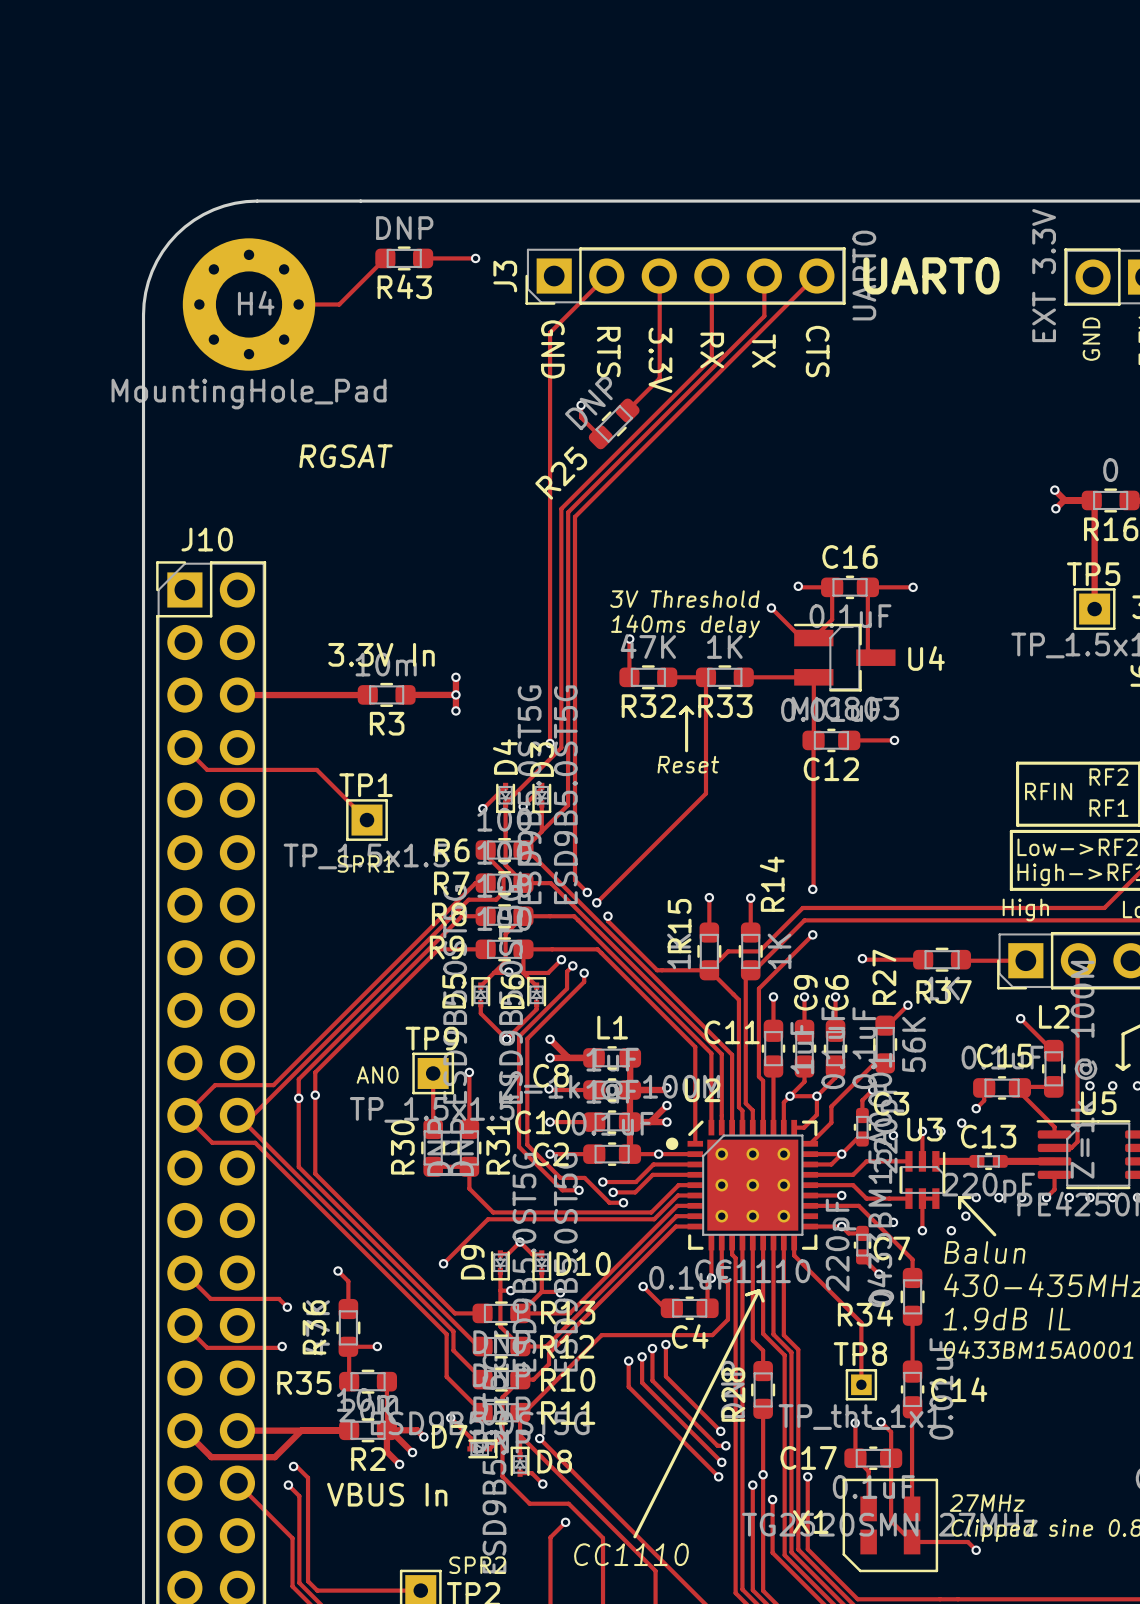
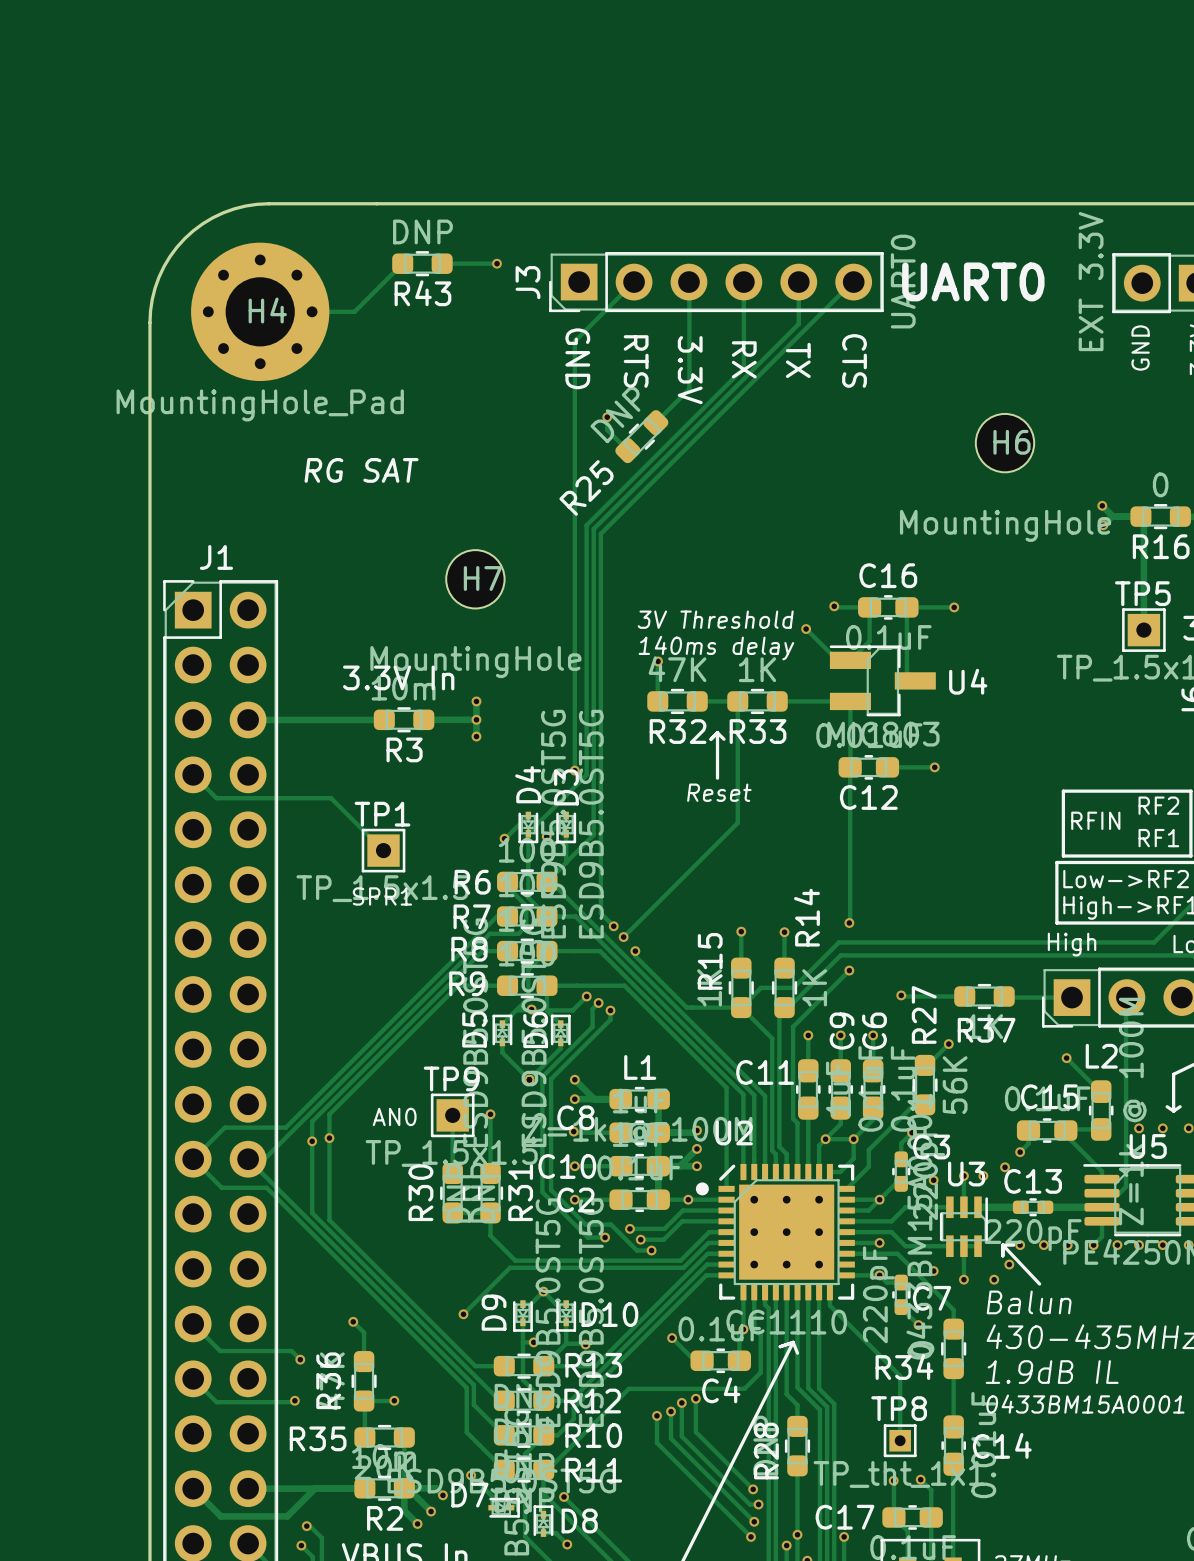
H6: none -> MountingHole (1005, 443)
text: RGSAT (345, 456) -> RG SAT (361, 470)
J10 name: J10 (207, 539) -> J1 (216, 557)
H7: none -> MountingHole (475, 579)

